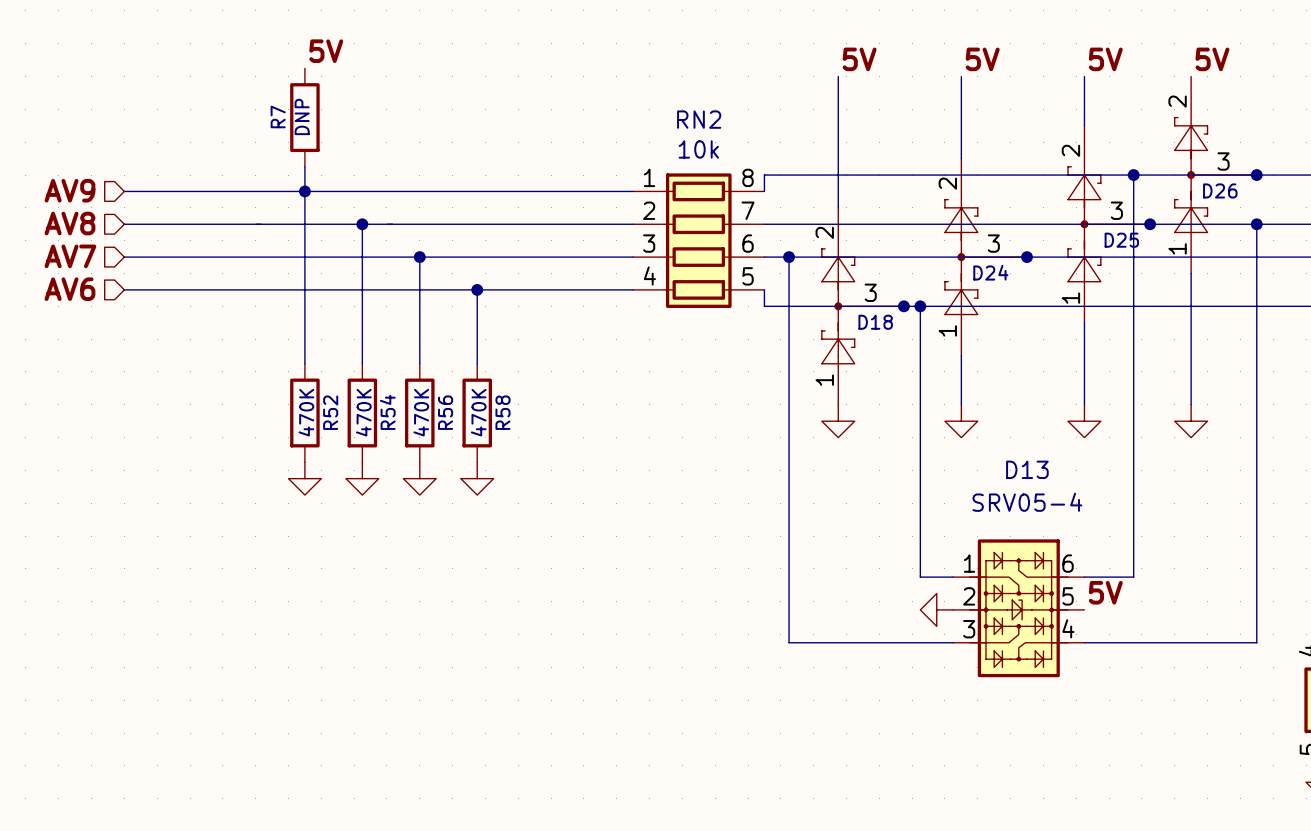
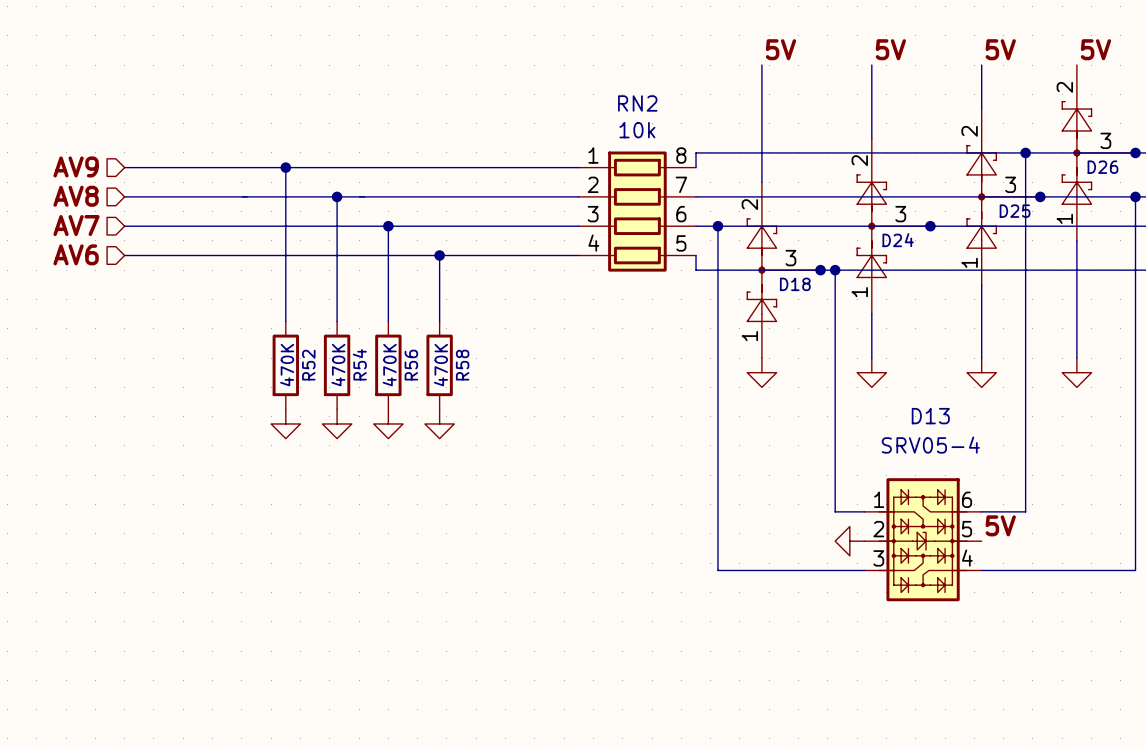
label: 5V (326, 51) -> none
R7: DNP (304, 117) -> none
wire: (304, 166) (304, 191) -> none

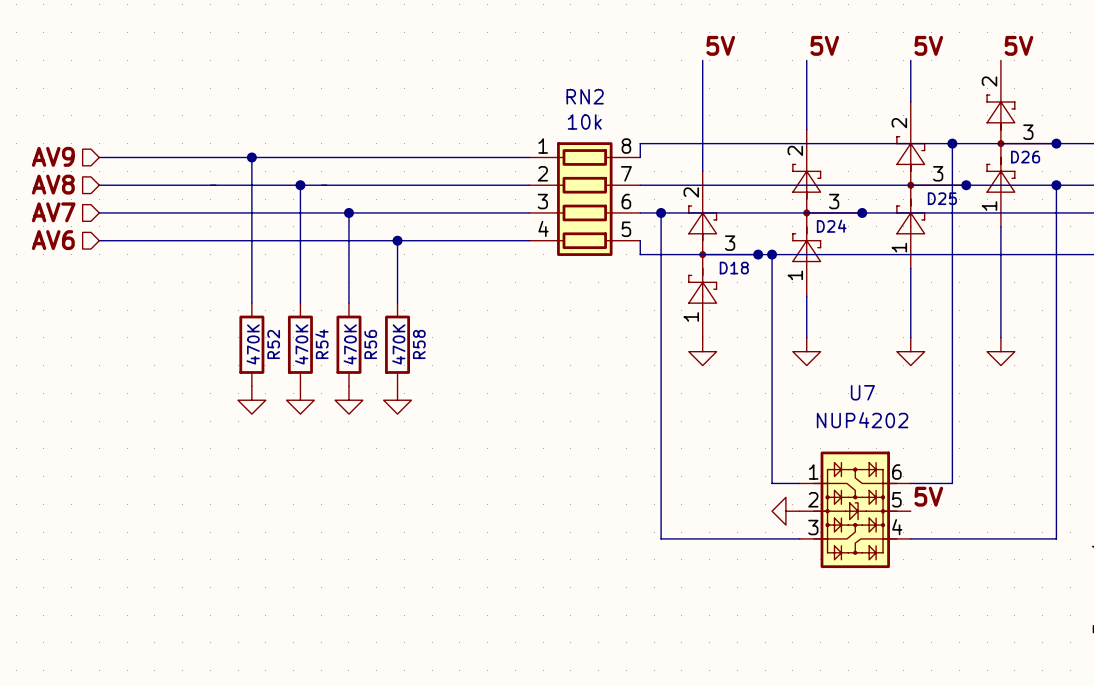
D13 name: D13 (930, 416) -> U7 (862, 392)
D13 value: SRV05-4 (930, 445) -> NUP4202 (862, 420)

